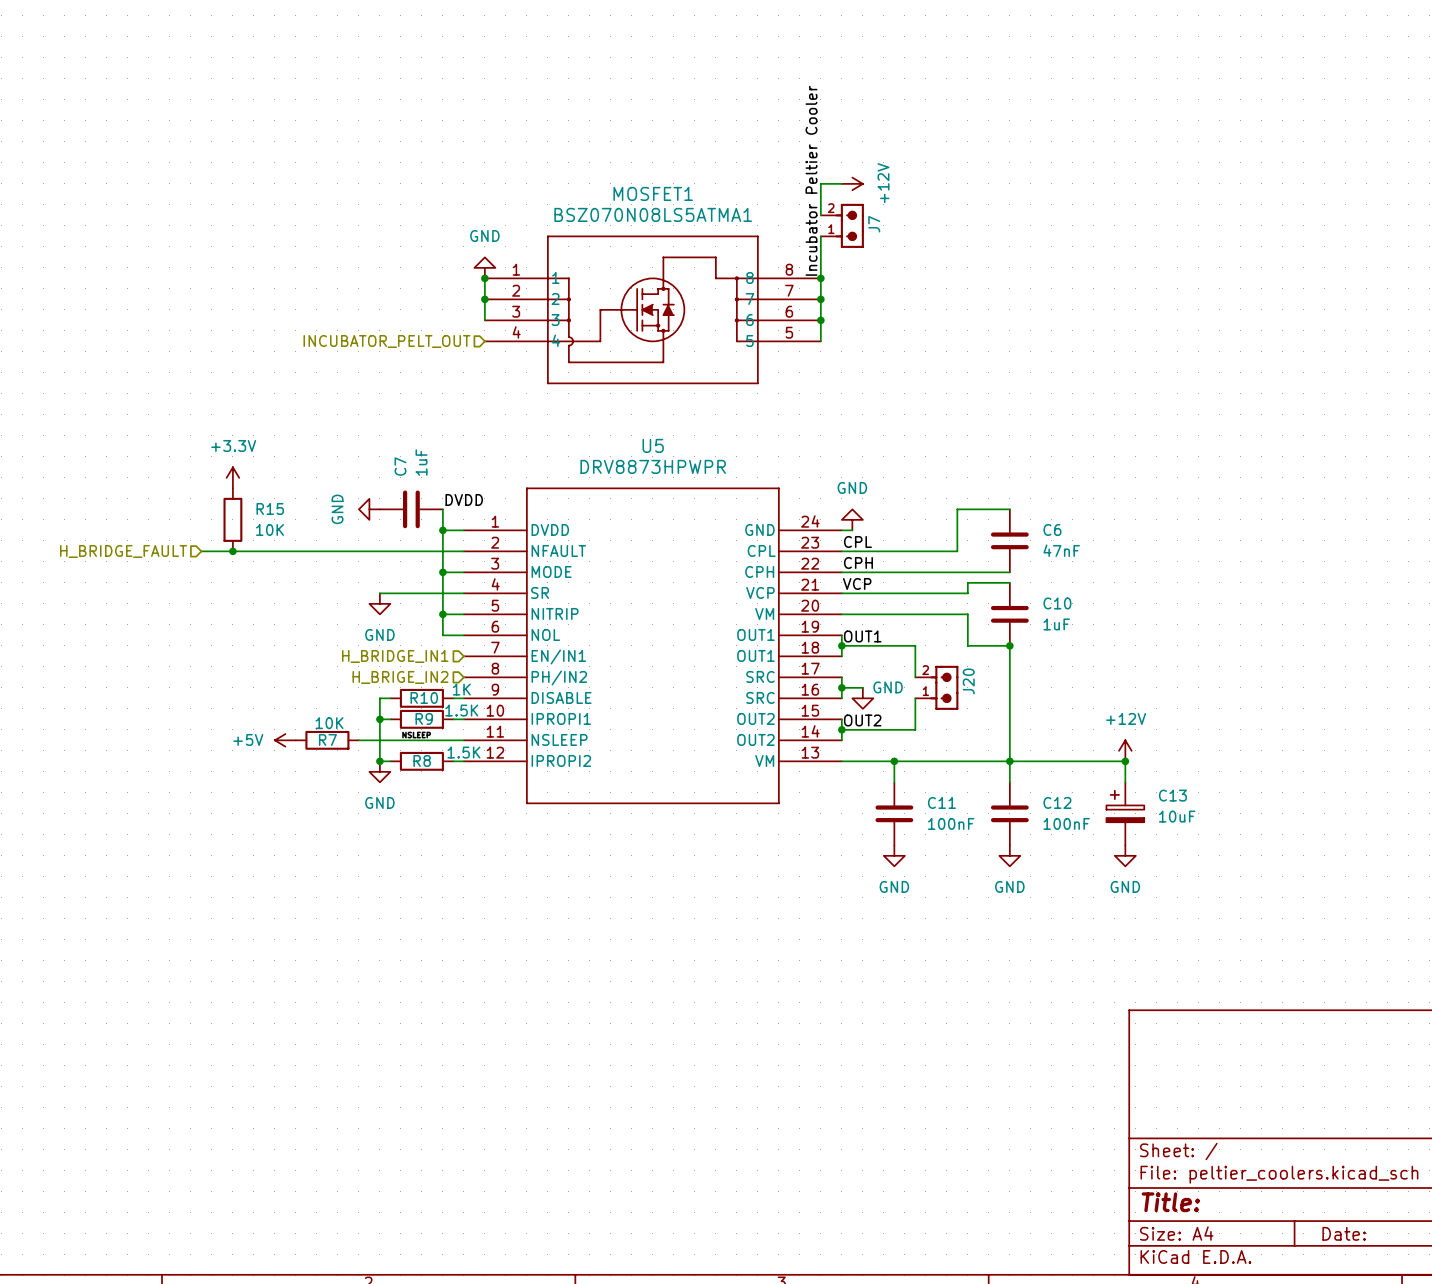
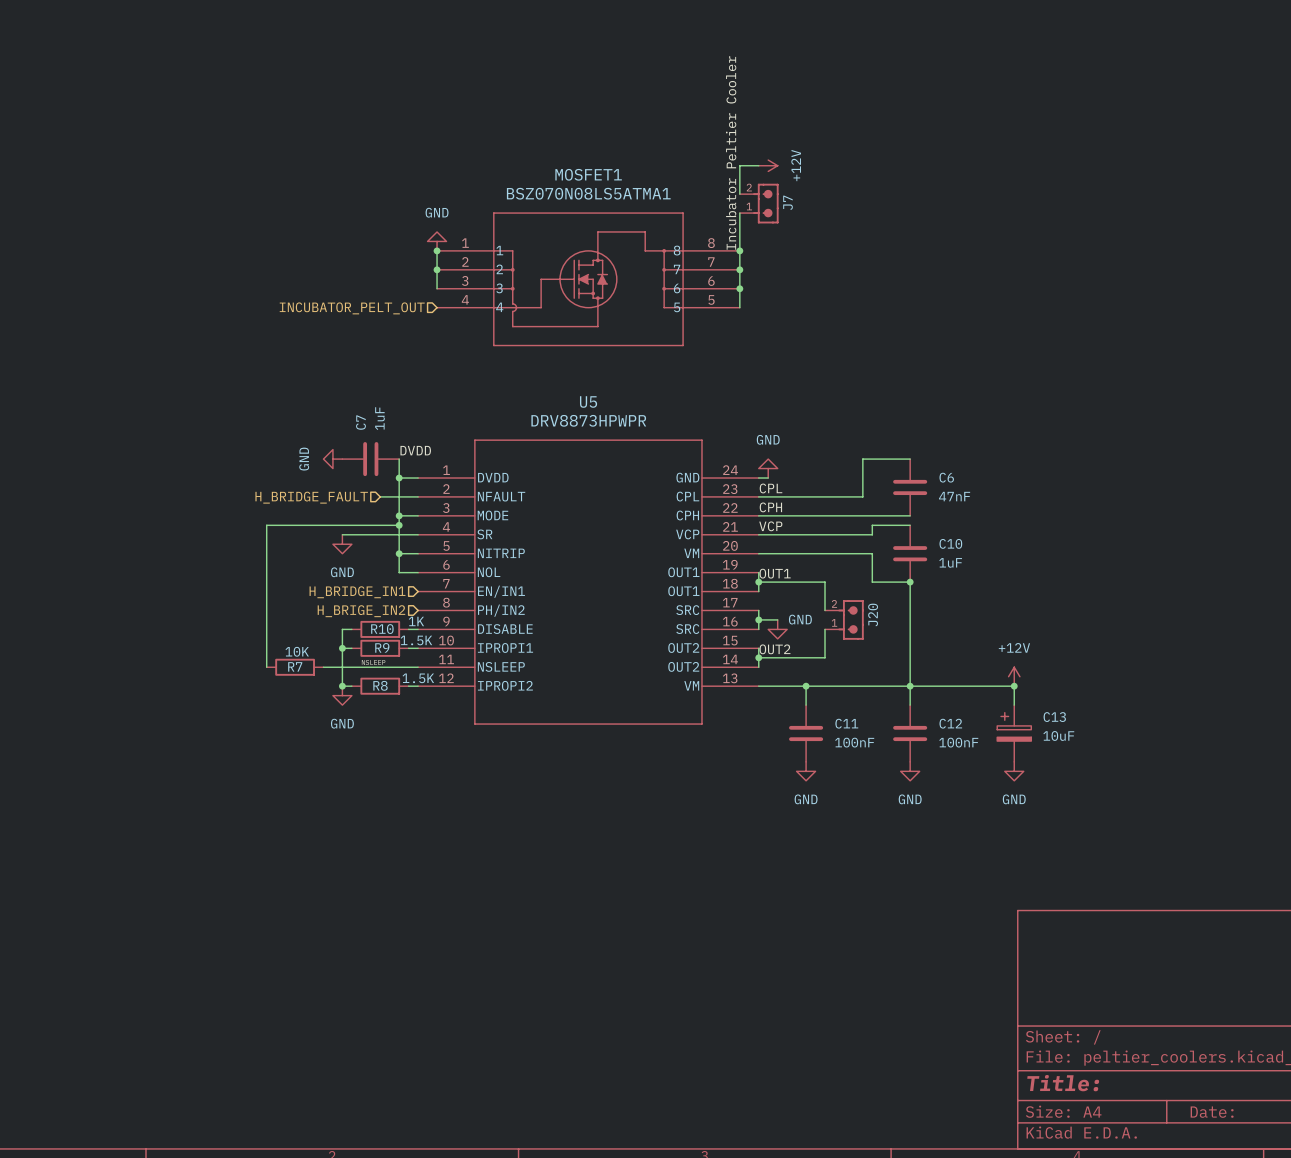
power symbol: +3.3V (232, 477) -> none
R15: 10K (232, 519) -> none
hierarchical label: H_BRIDGE_FAULT (123, 551) -> none
wire: (201, 551) (421, 551) -> none
junction: (232, 551) -> none
hierarchical label: none -> H_BRIDGE_FAULT (311, 497)
wire: none -> (399, 525) (266, 525) (266, 667)
junction: none -> (399, 525)
power symbol: +5V (285, 740) -> none

